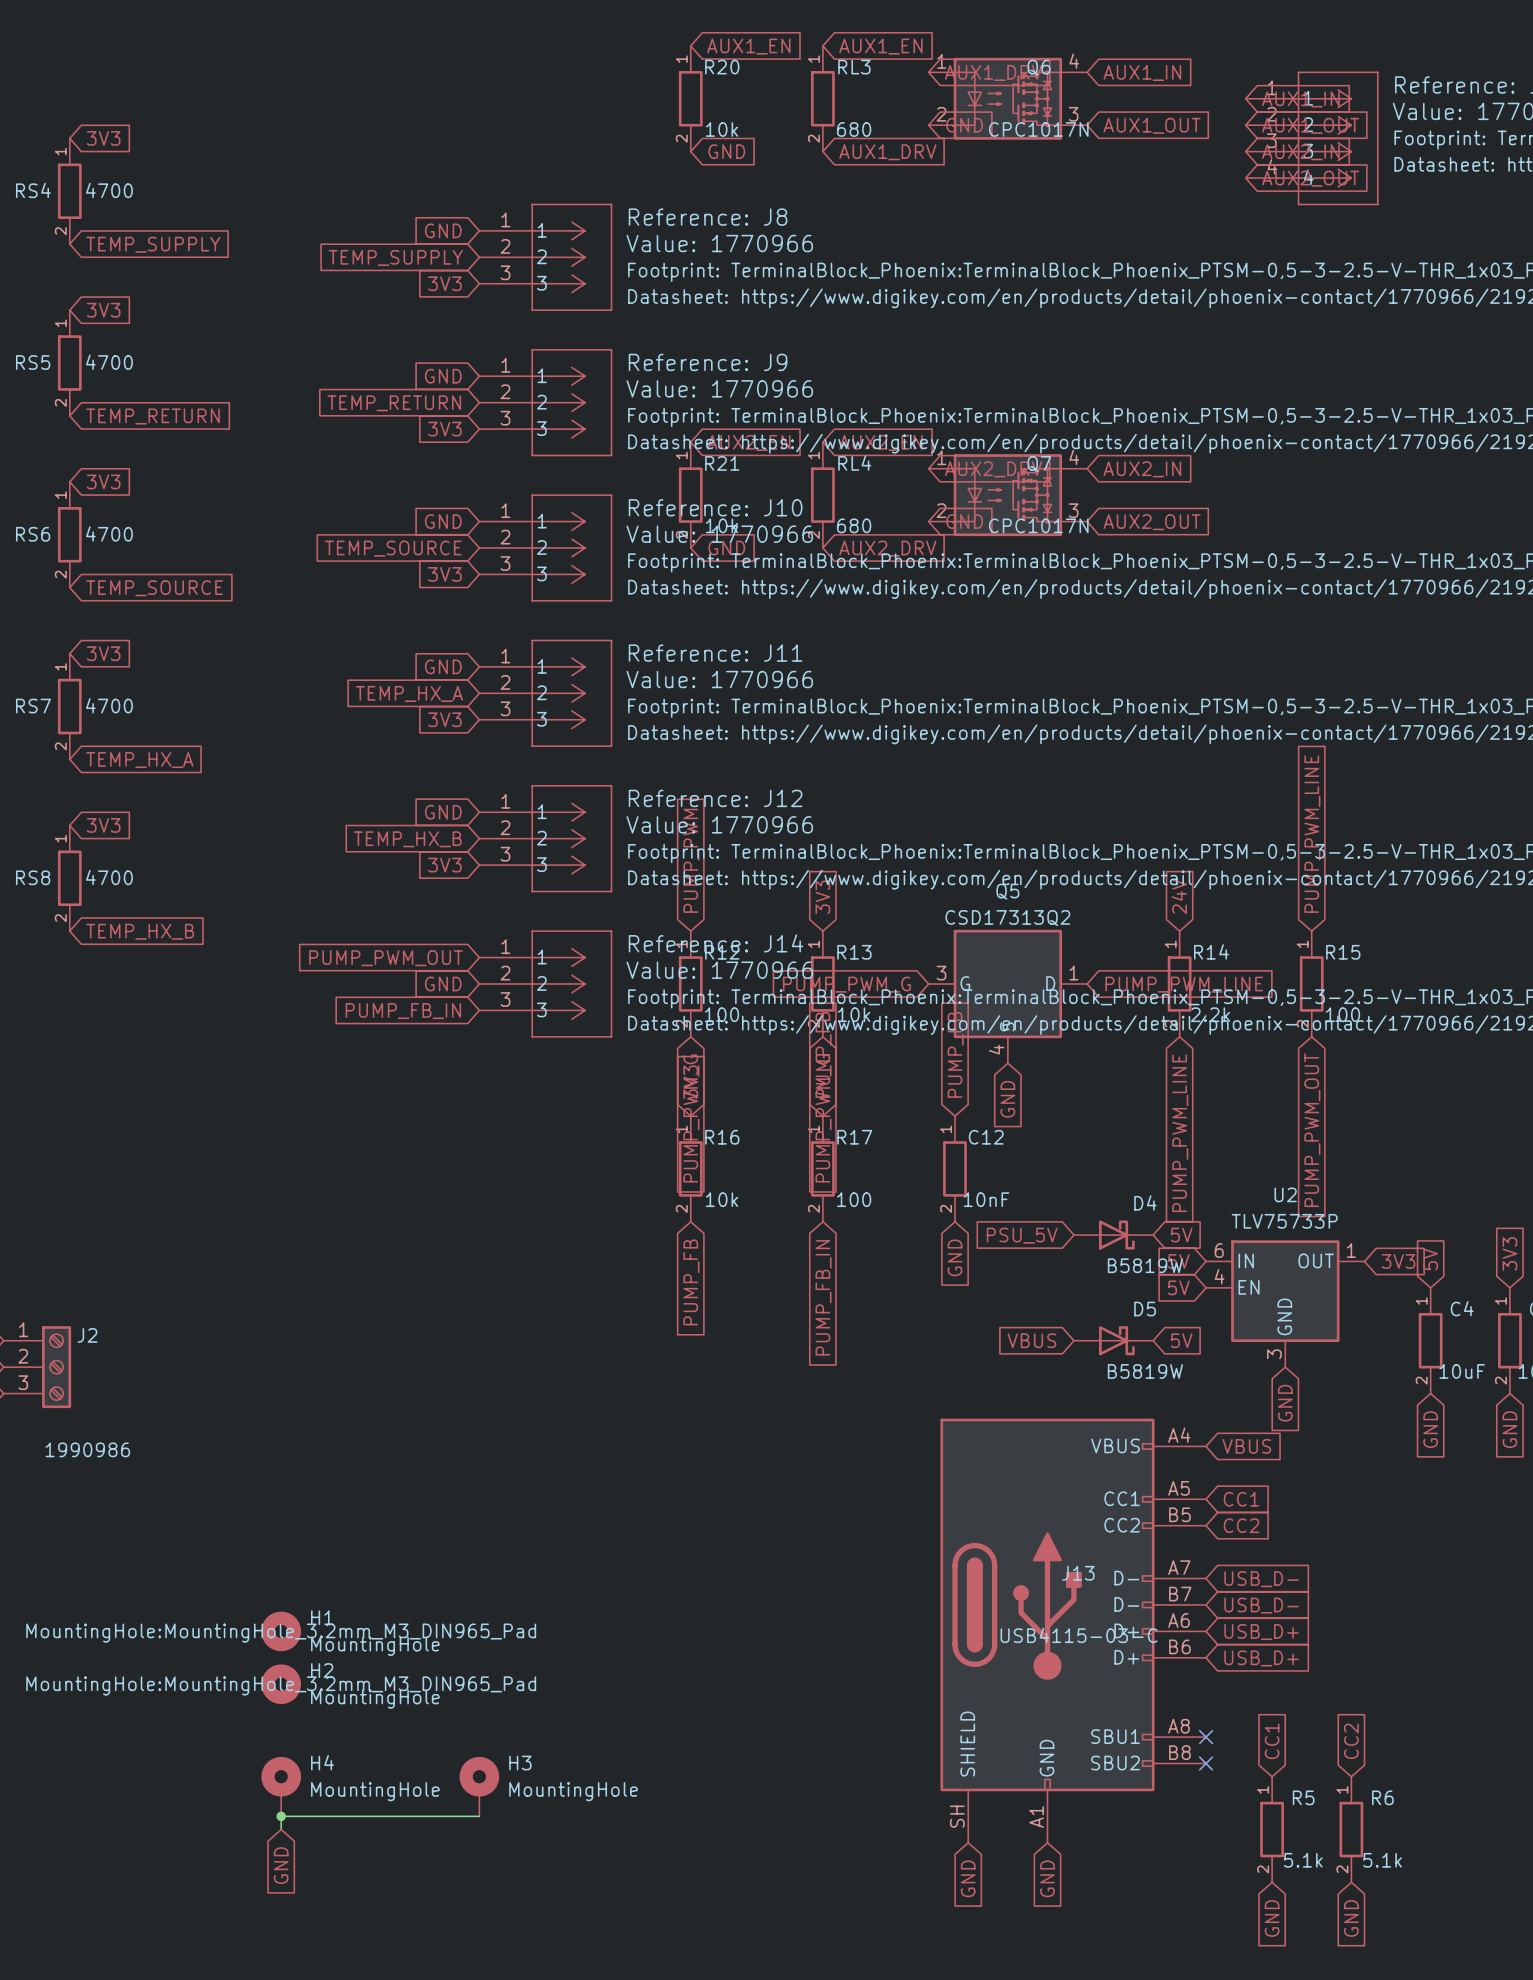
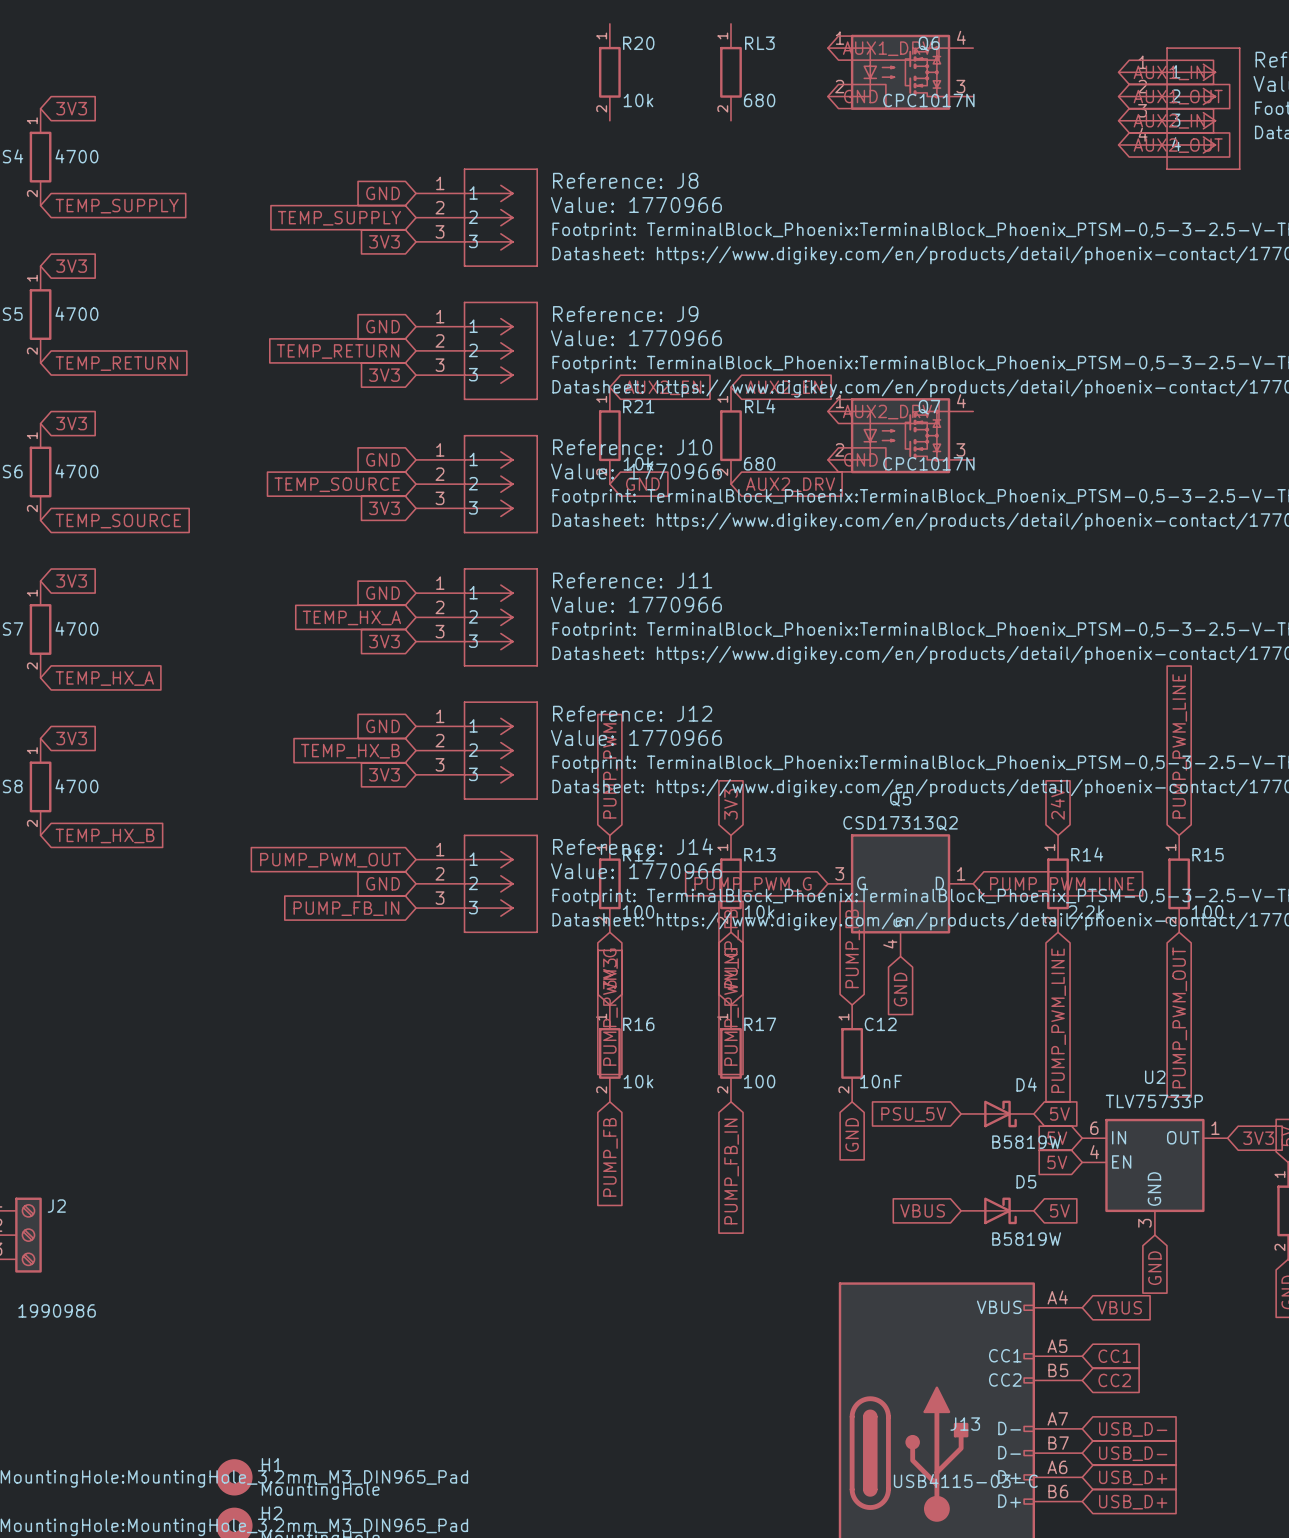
global label: AUX1_EN (748, 46) -> none
global label: AUX1_EN (880, 46) -> none
global label: AUX1_IN (1142, 72) -> none
global label: AUX1_OUT (1152, 125) -> none
global label: GND (726, 151) -> none
global label: AUX1_DRV (887, 152) -> none
global label: AUX2_IN (1142, 469) -> none
global label: AUX2_OUT (1152, 522) -> none

